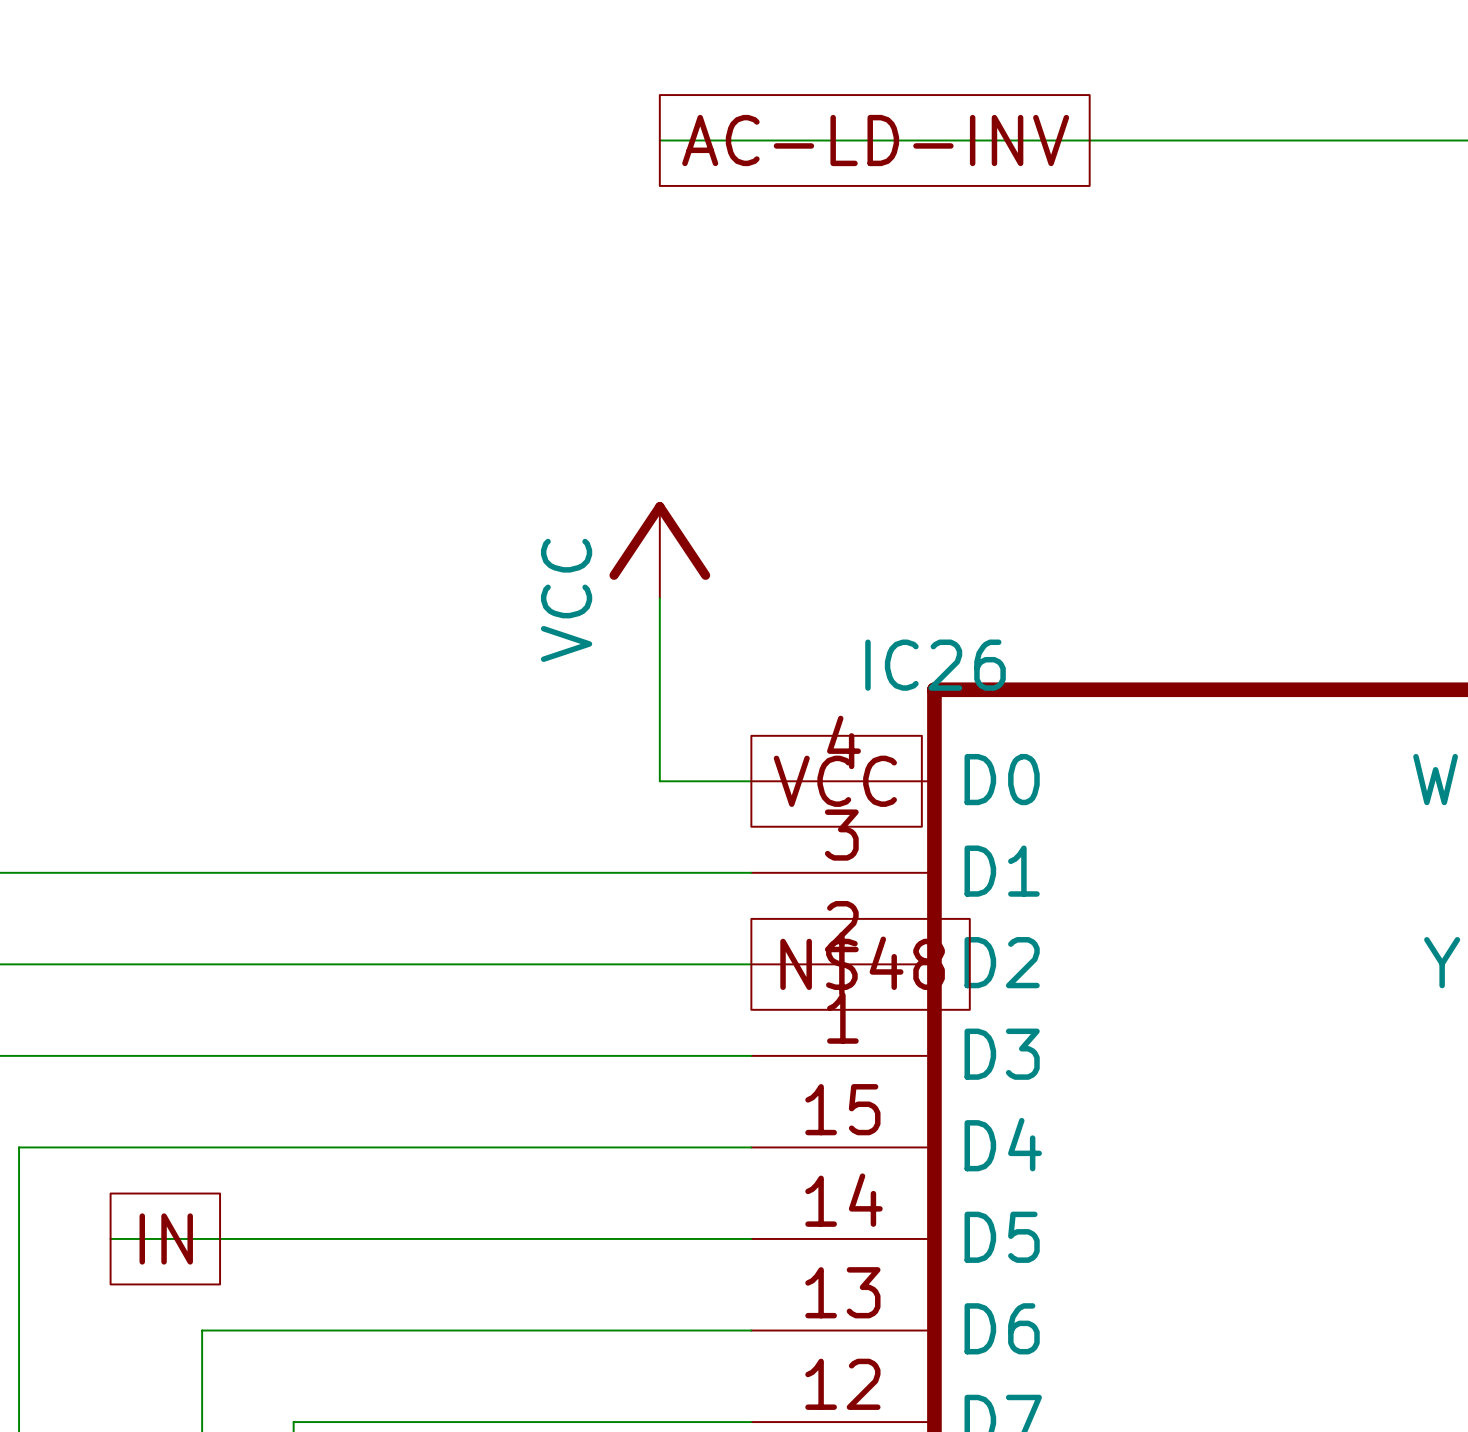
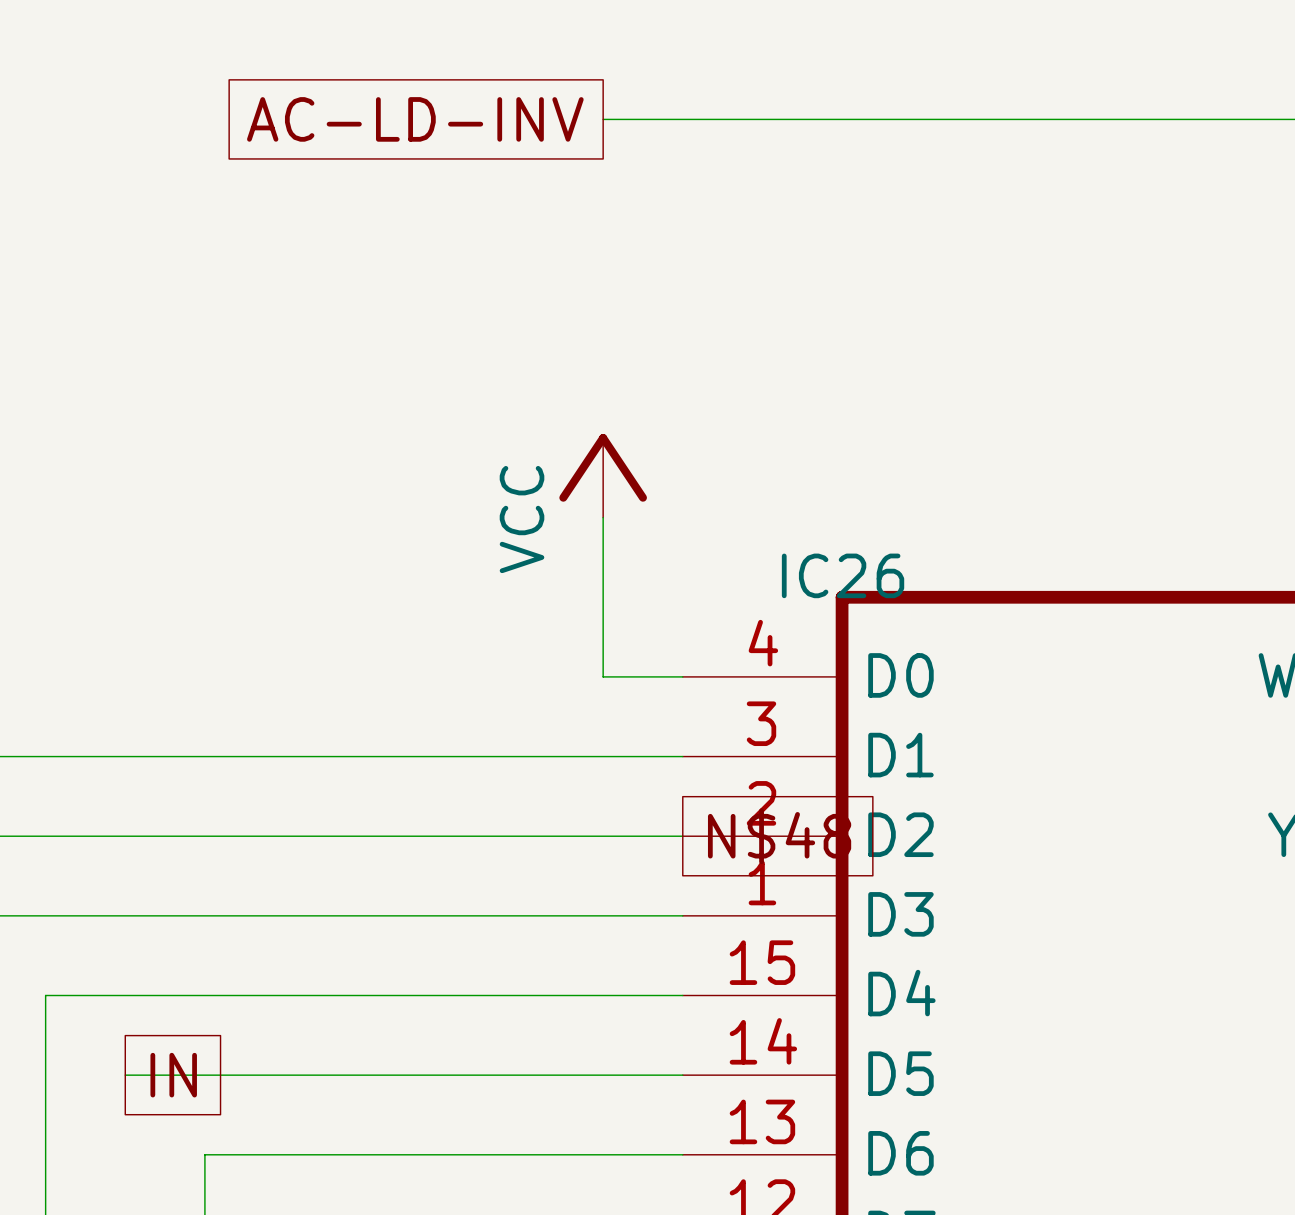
global label rotation: 0° (875, 140) -> 180° (415, 119)
global label: VCC (835, 781) -> none

